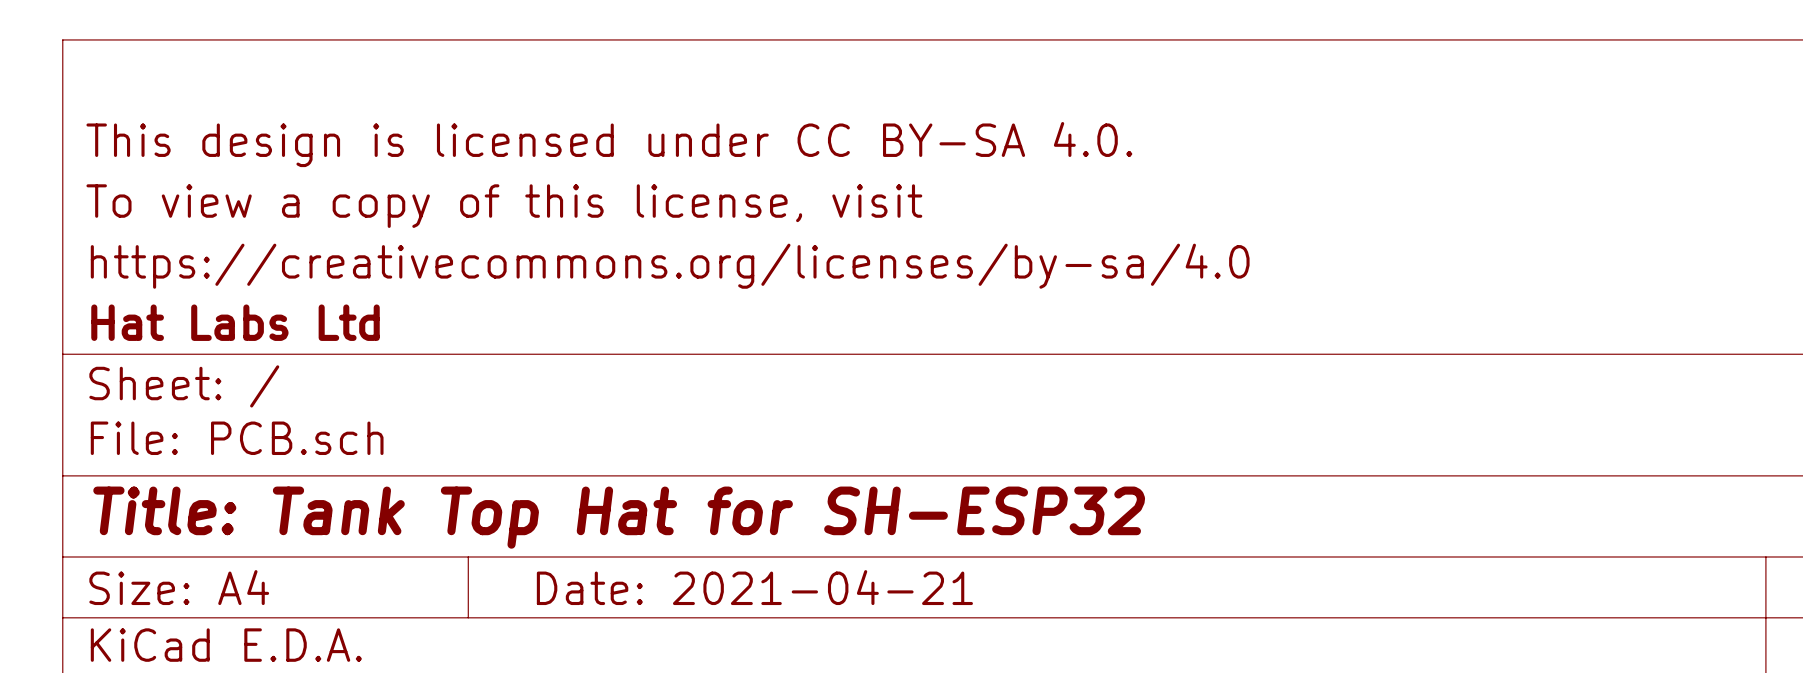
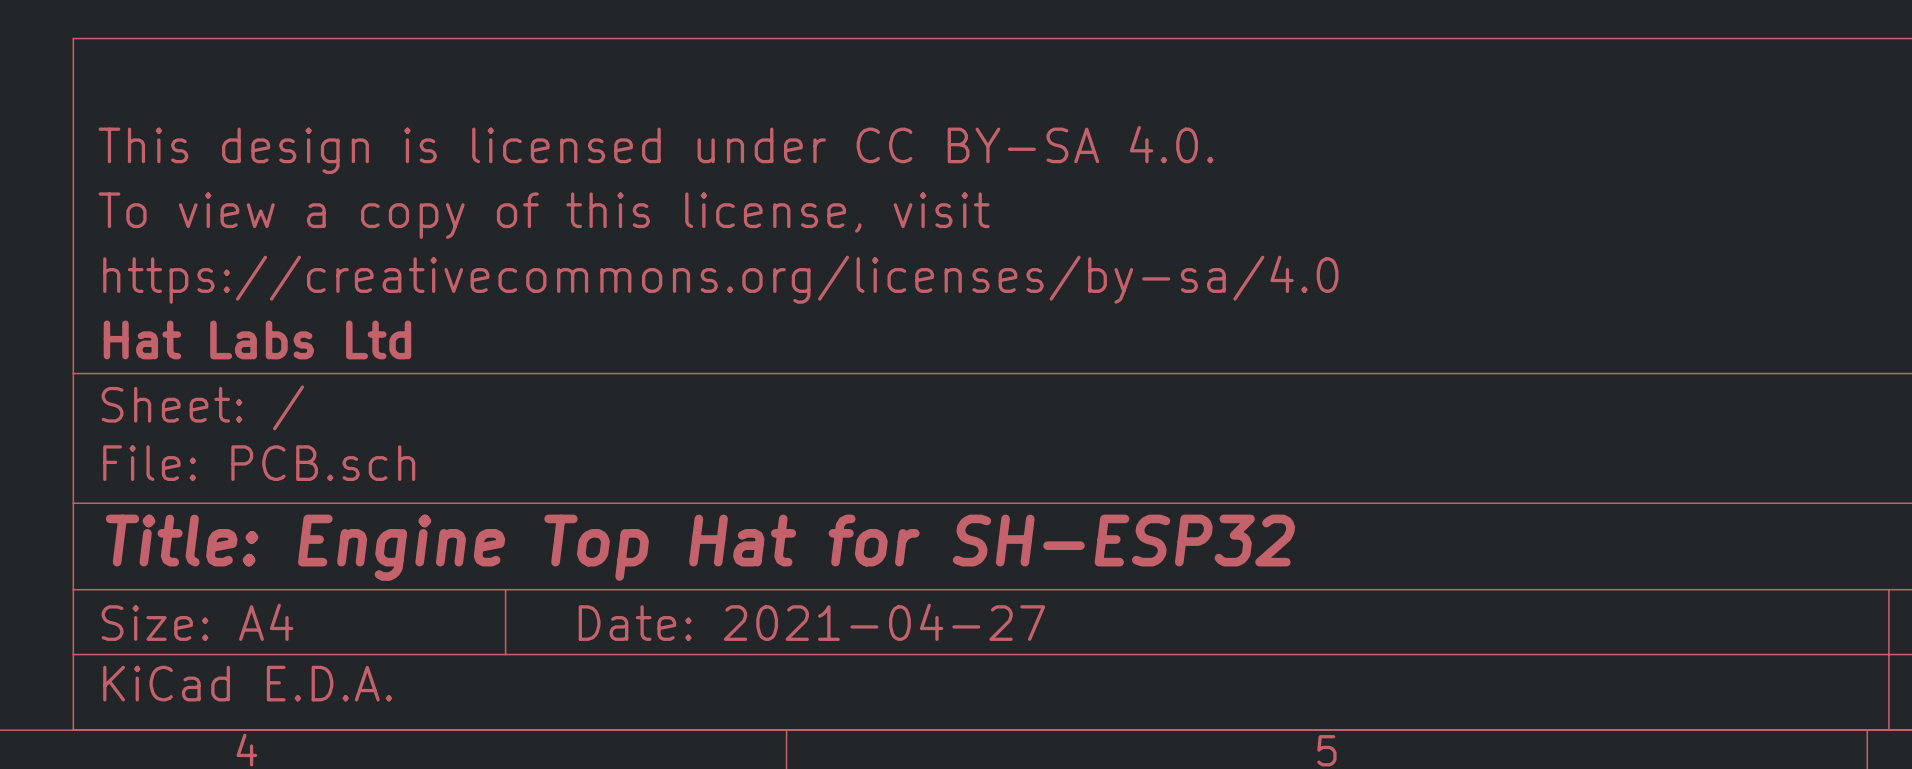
title block: Title: Tank Top Hat for SH-ESP32 (619, 517) -> Title: Engine Top Hat for SH-ESP32 (700, 547)
title block: Date: 2021-04-21 (754, 587) -> Date: 2021-04-27 (811, 622)

